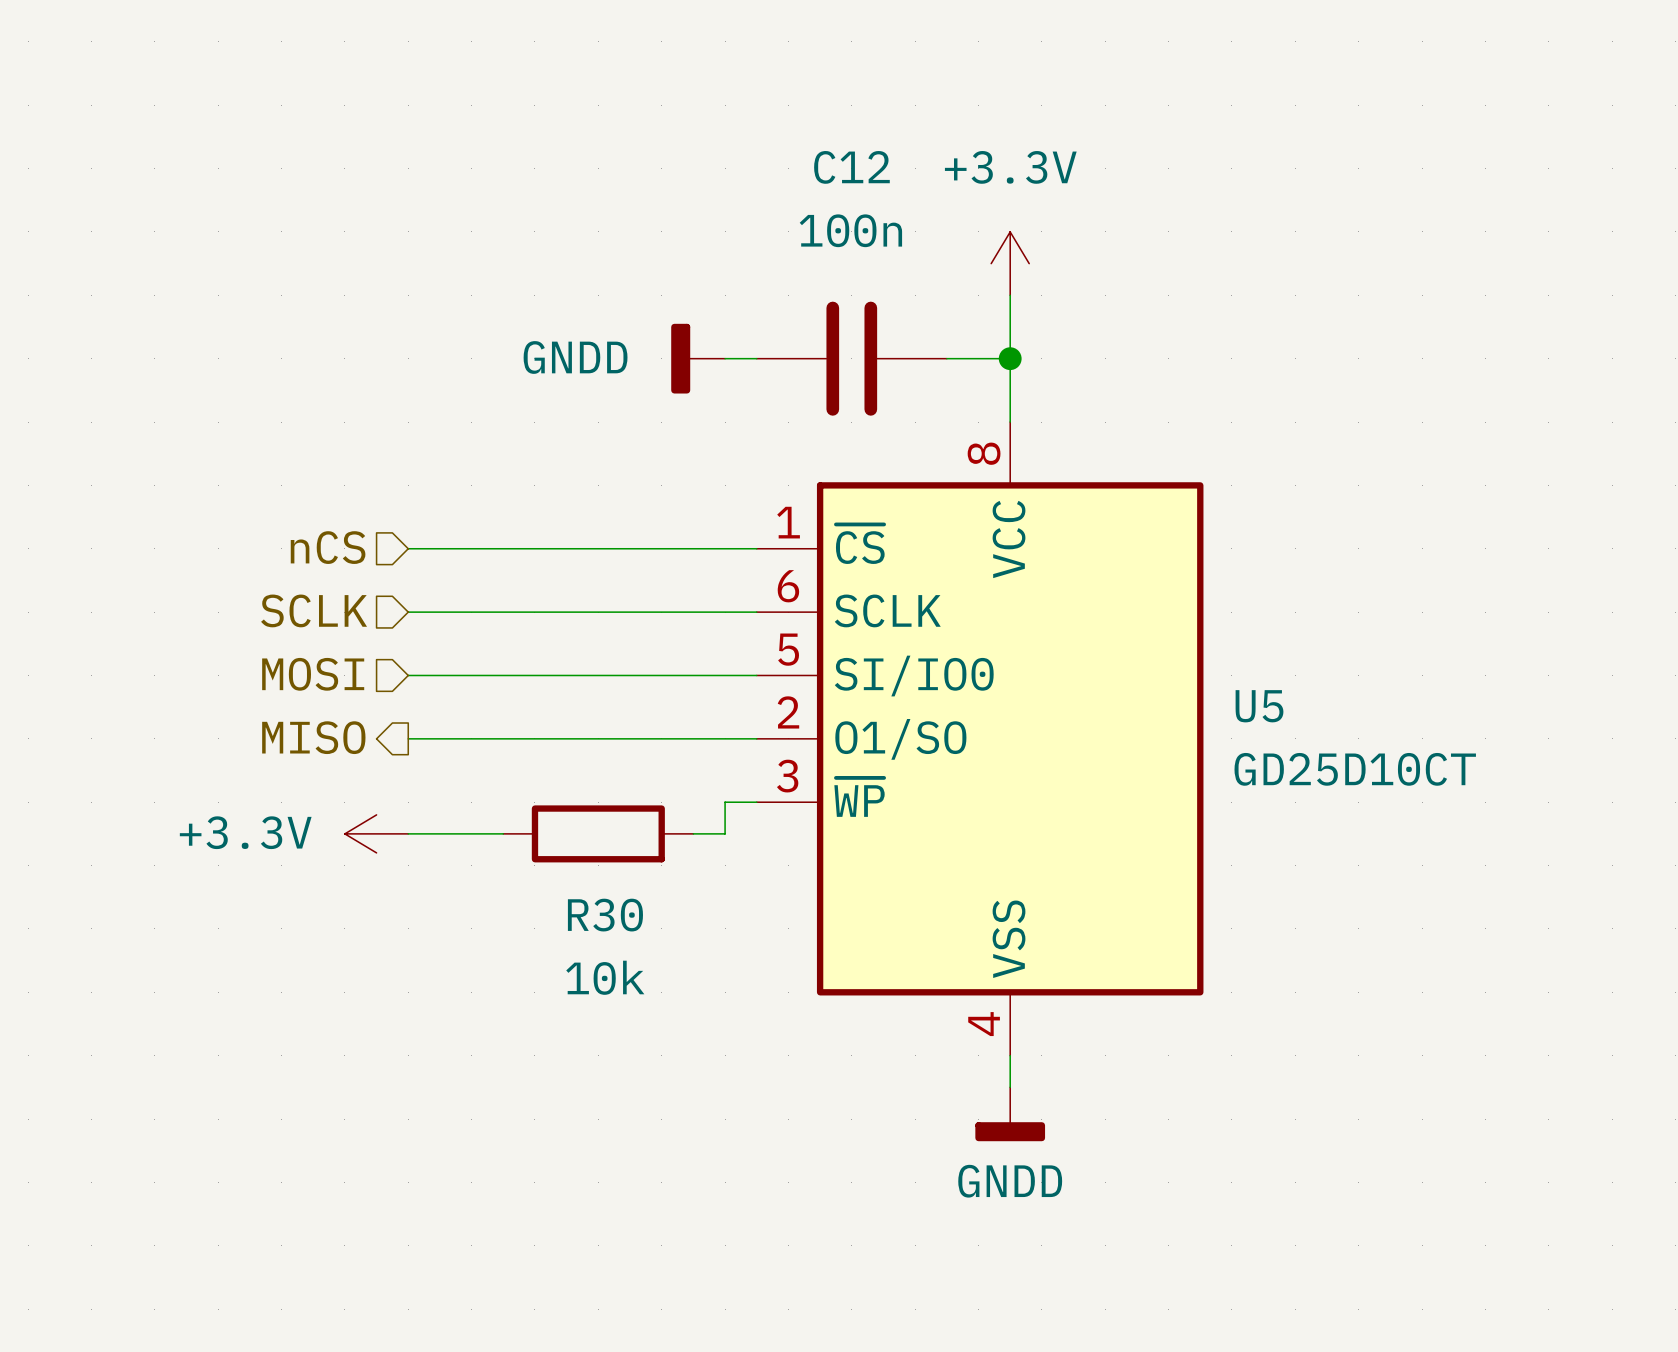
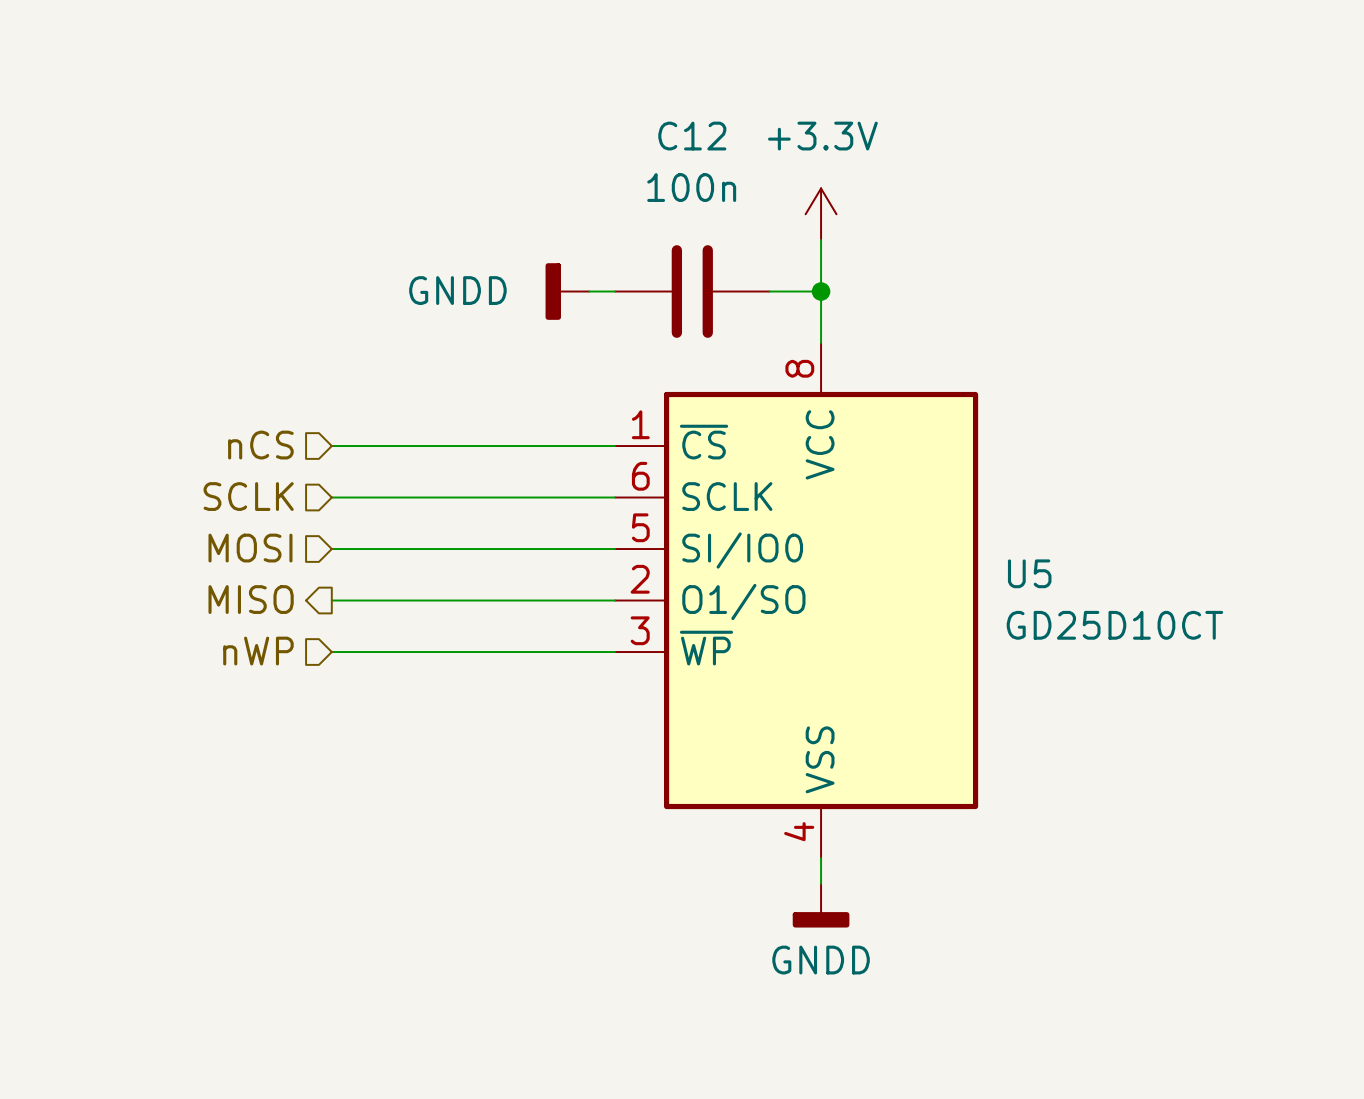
hierarchical label: none -> nWP (258, 651)
wire: (725, 802) (725, 833) (693, 833) -> (589, 652) (331, 652)
power symbol: +3.3V (376, 833) -> none
wire: (408, 833) (503, 833) -> none
R30: 10k (598, 833) -> none

